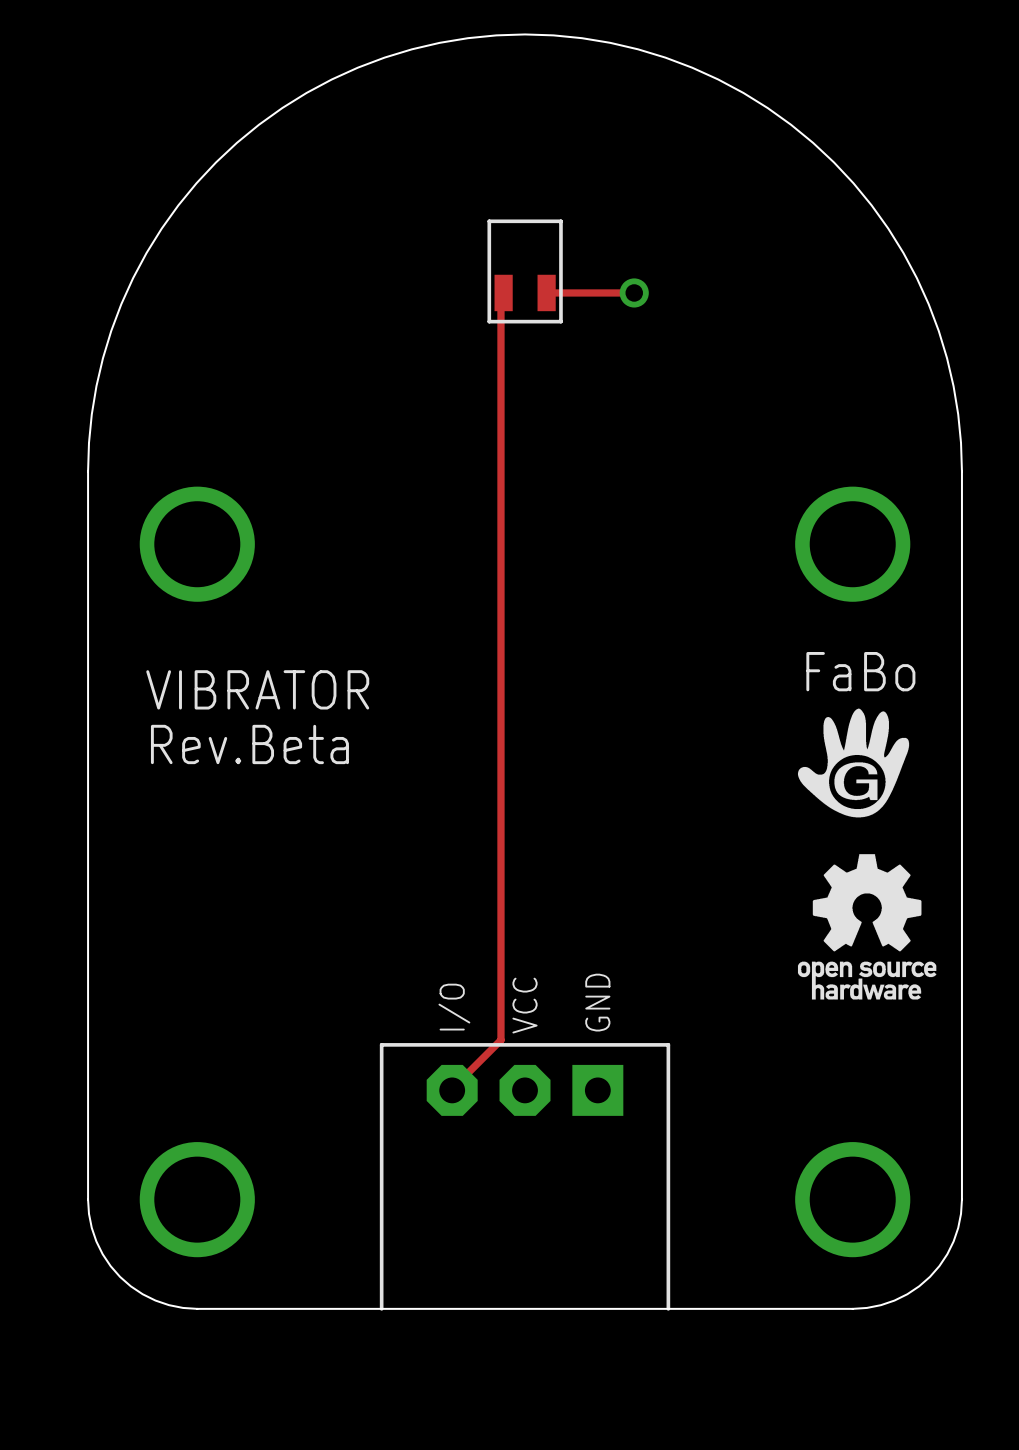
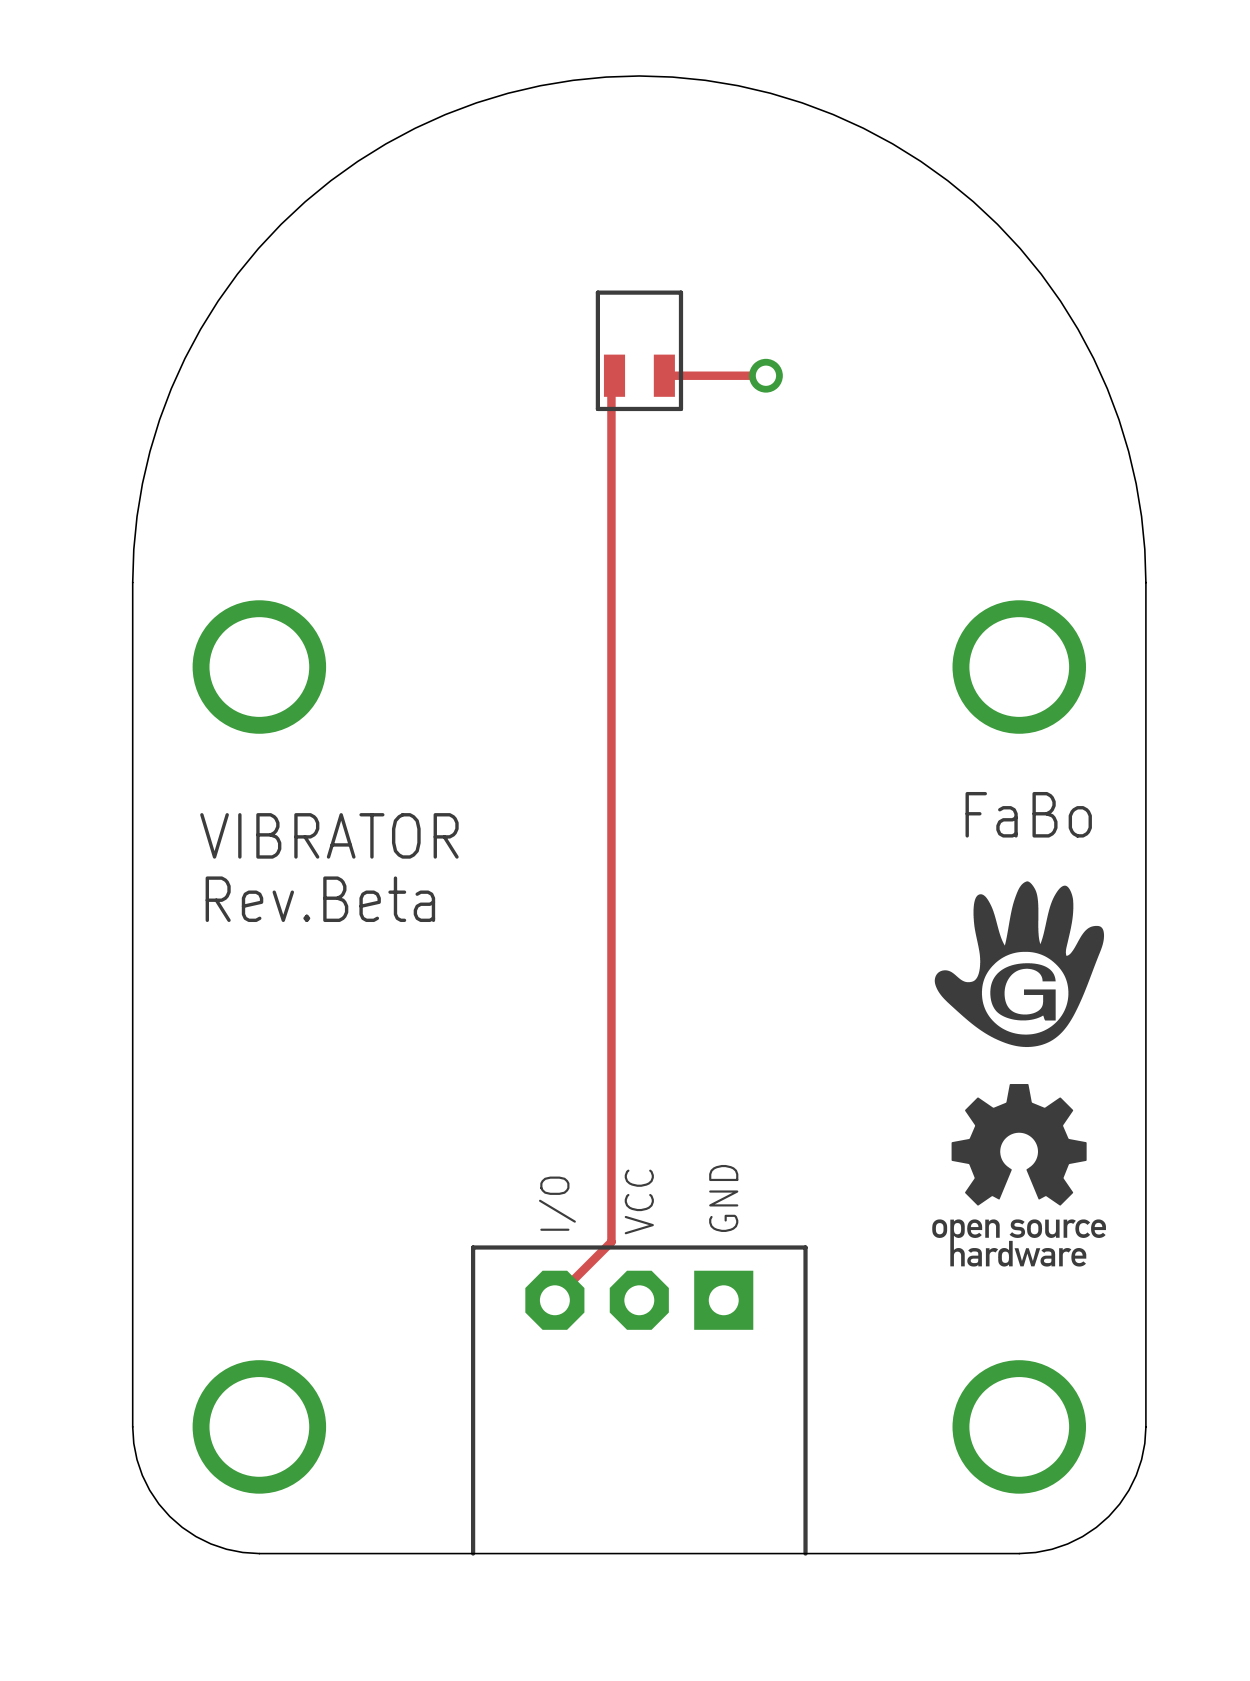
drawing: [797, 708, 910, 818] -> none
drawing: none -> [932, 881, 1106, 1267]
drawing: [797, 854, 937, 1000] -> none

